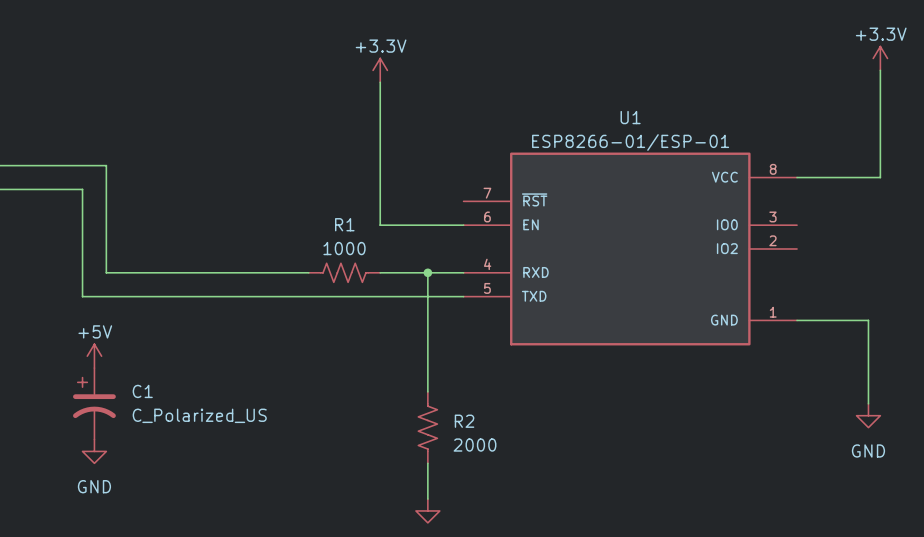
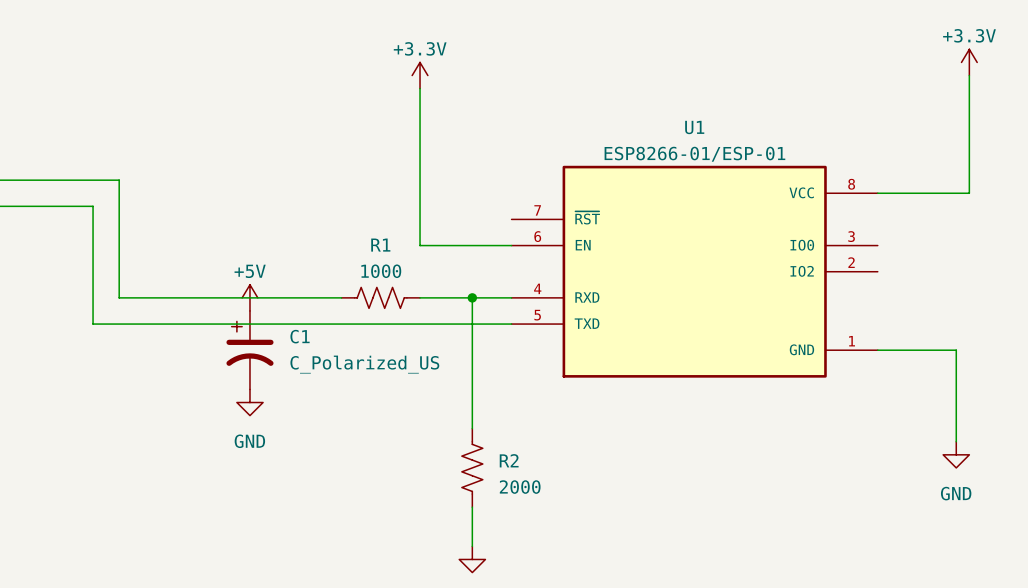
power symbol position: +5V (94, 356) -> +5V (249, 297)
C1 position: (94, 403) -> (249, 350)
power symbol position: GND (94, 451) -> GND (249, 402)

